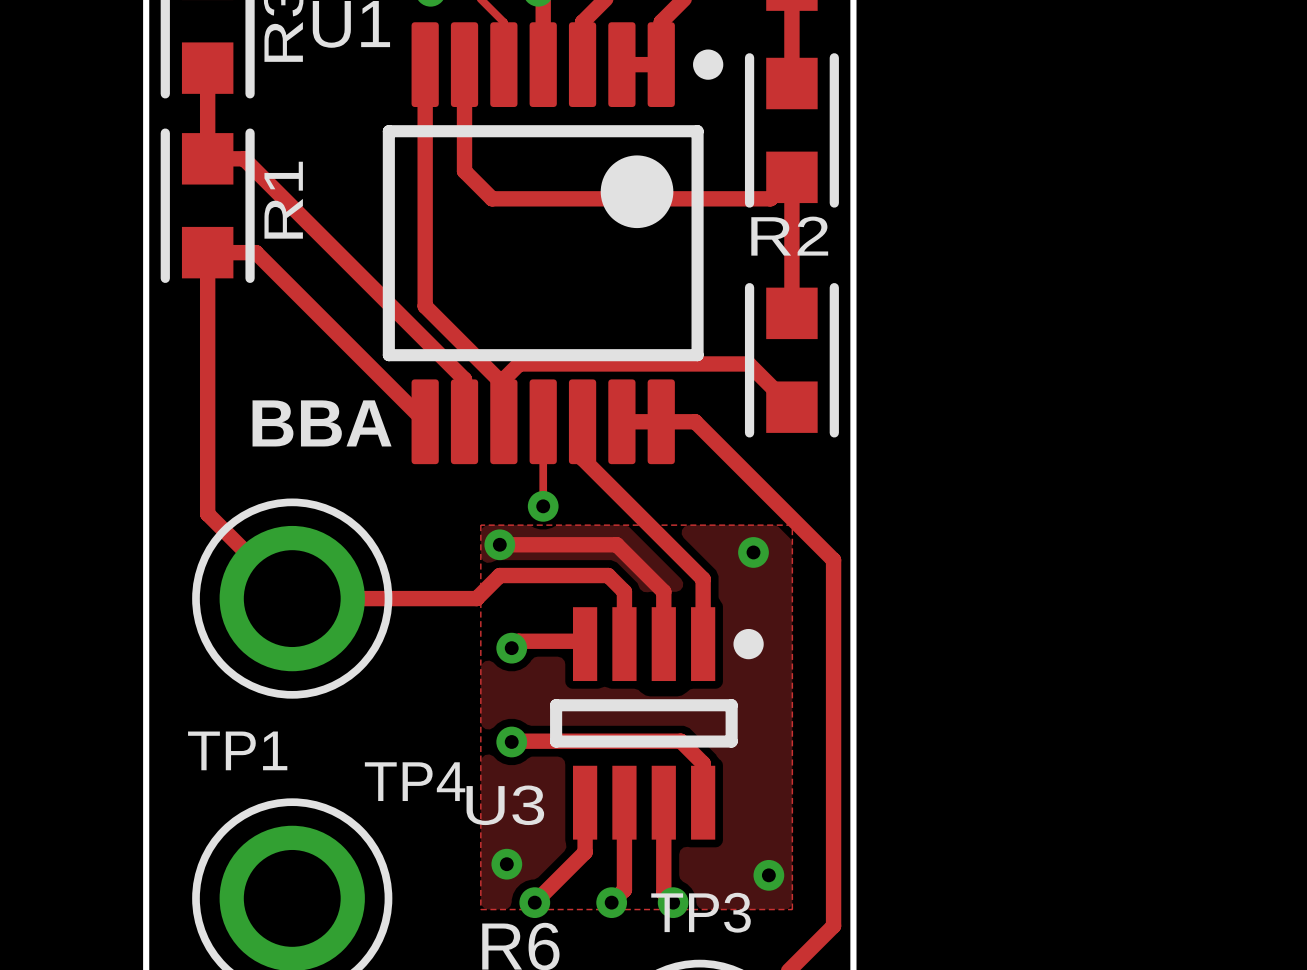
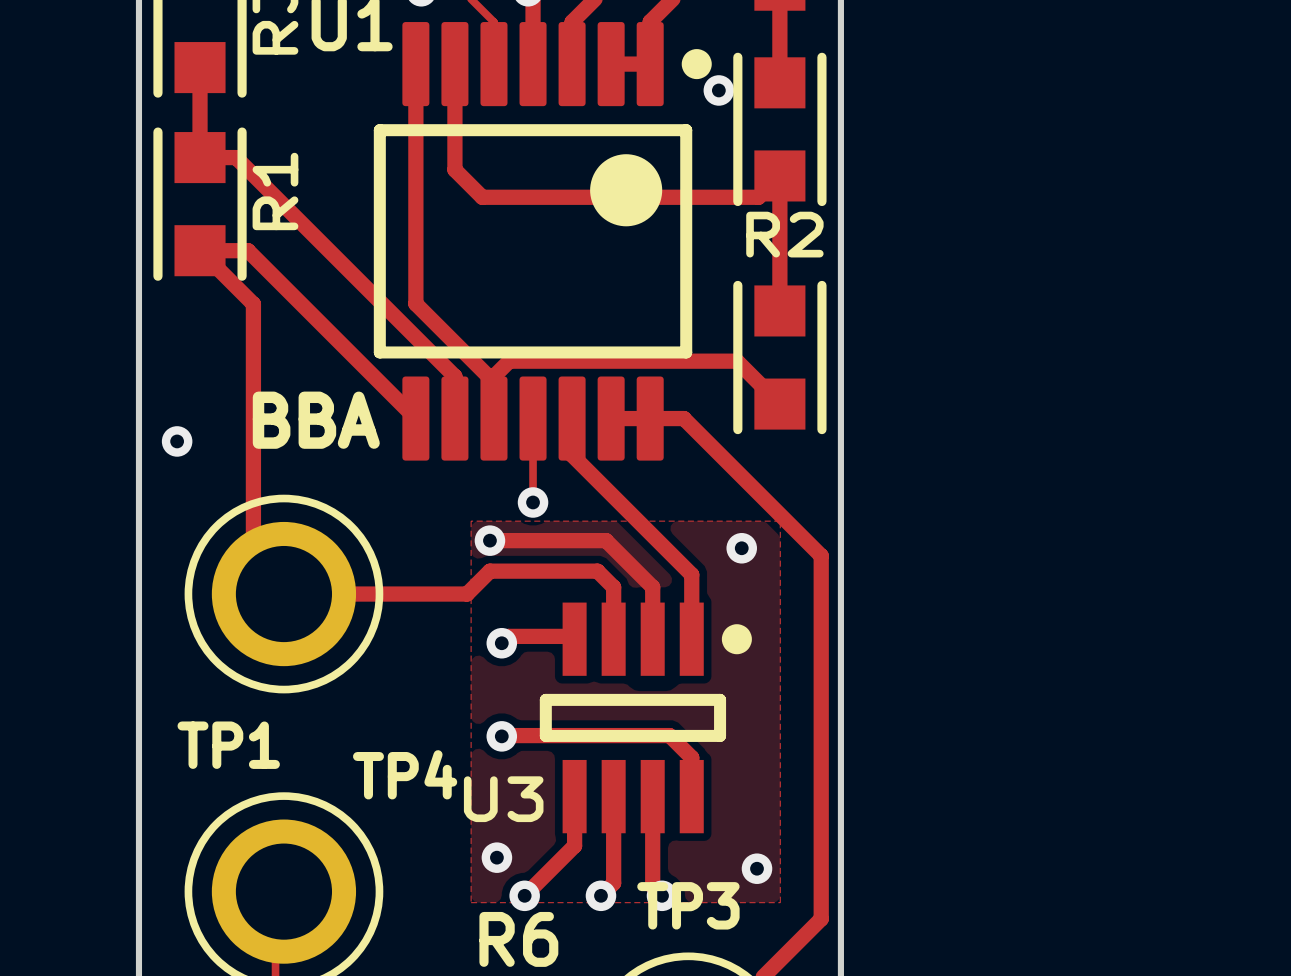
via: none -> (718, 90)
track: (207, 252) (207, 514) (261, 567) -> (200, 250) (253, 304) (253, 563)
via: none -> (177, 441)

